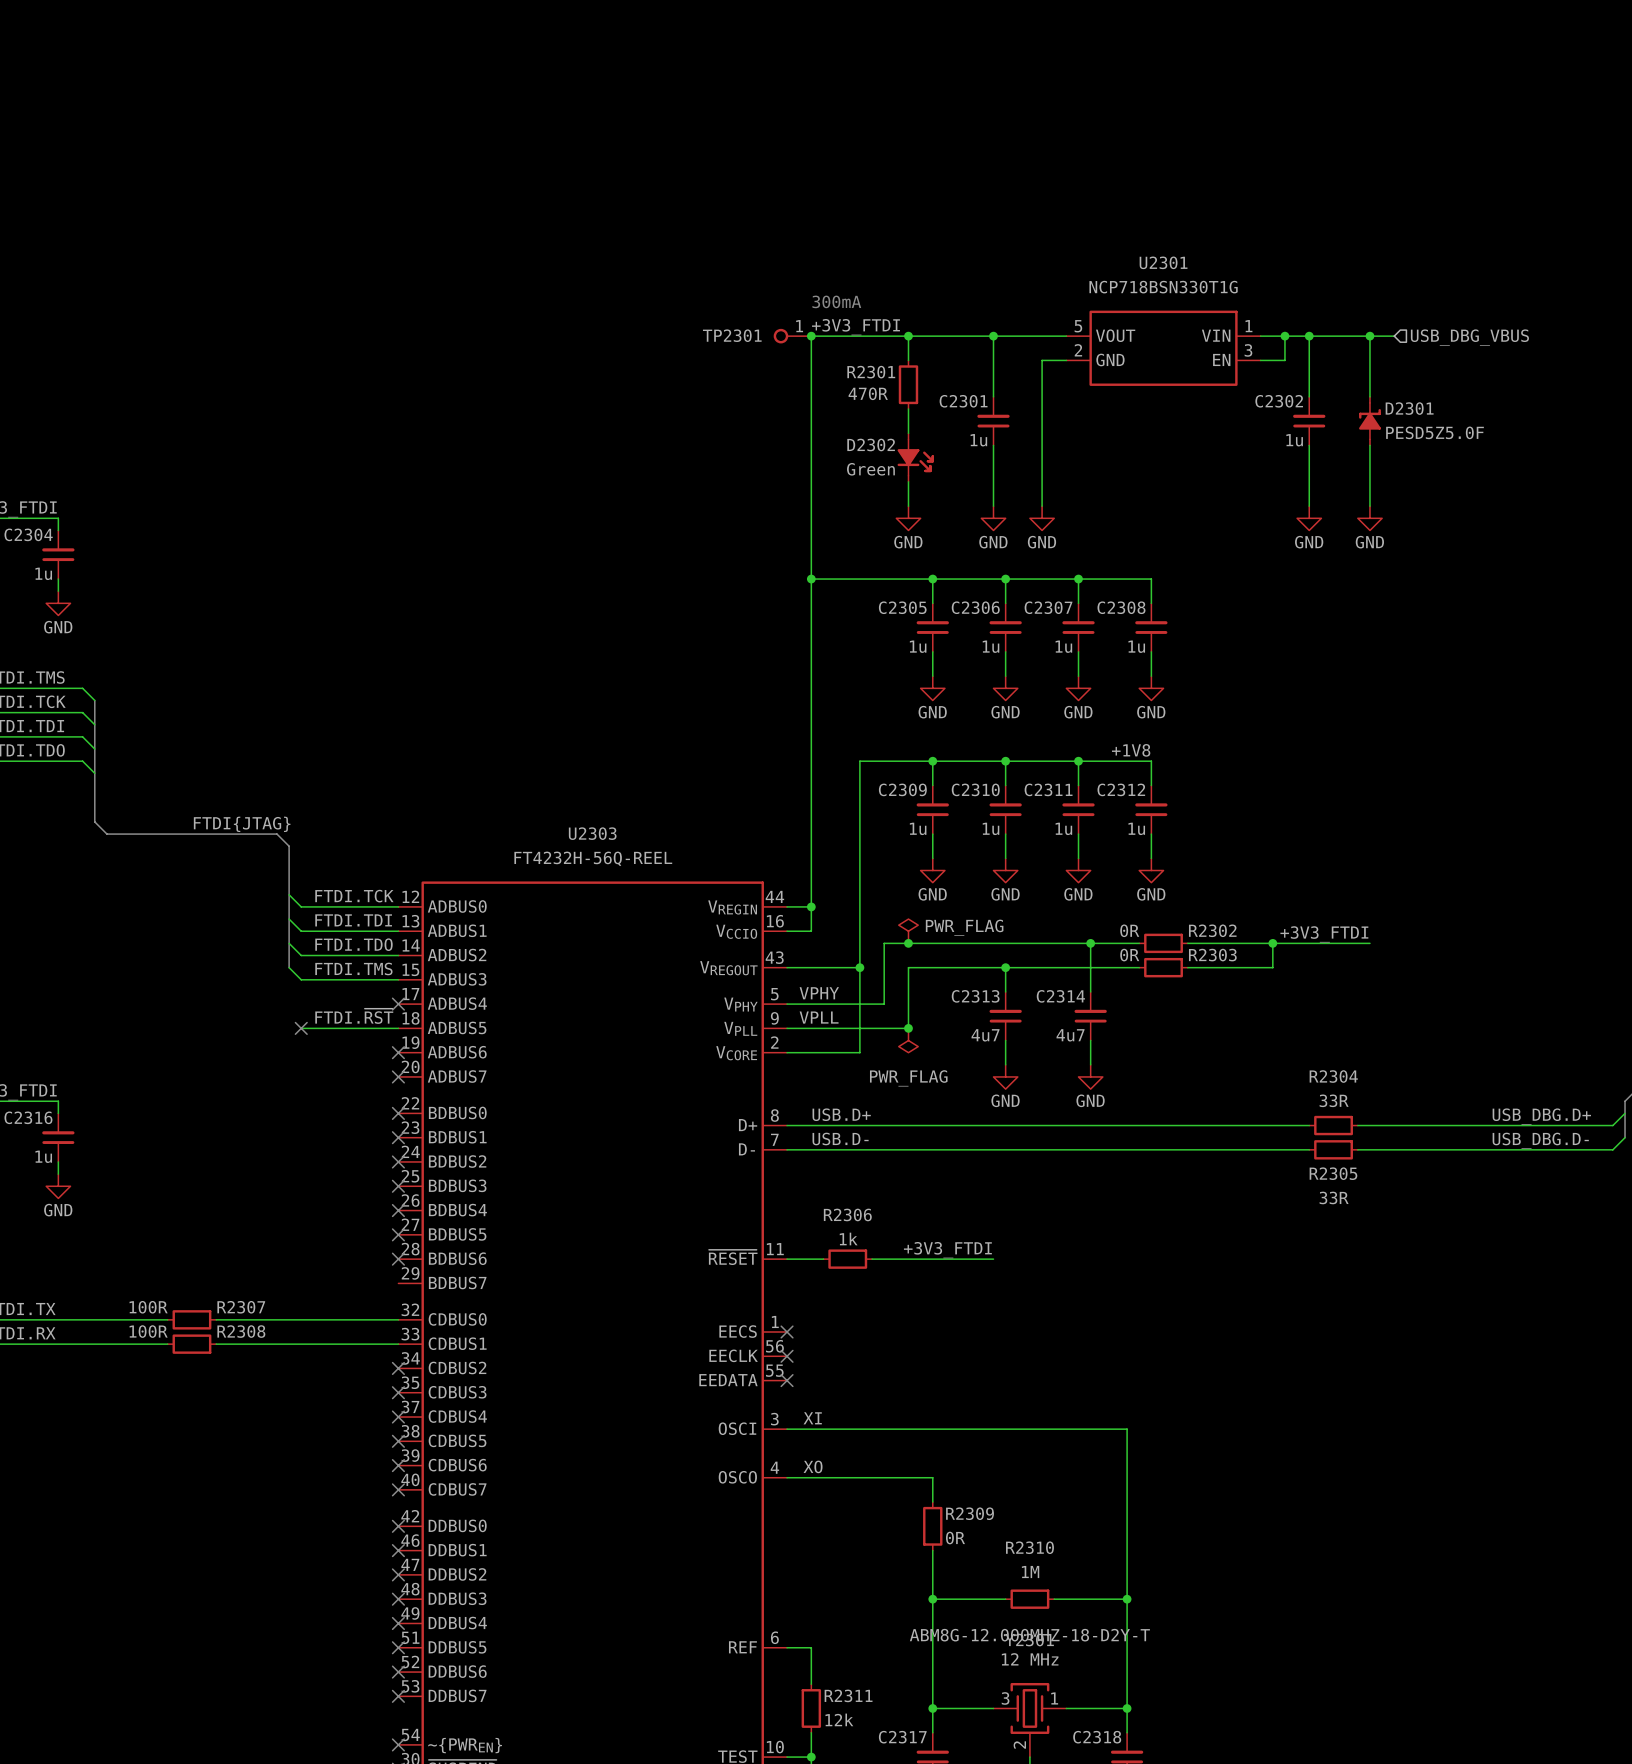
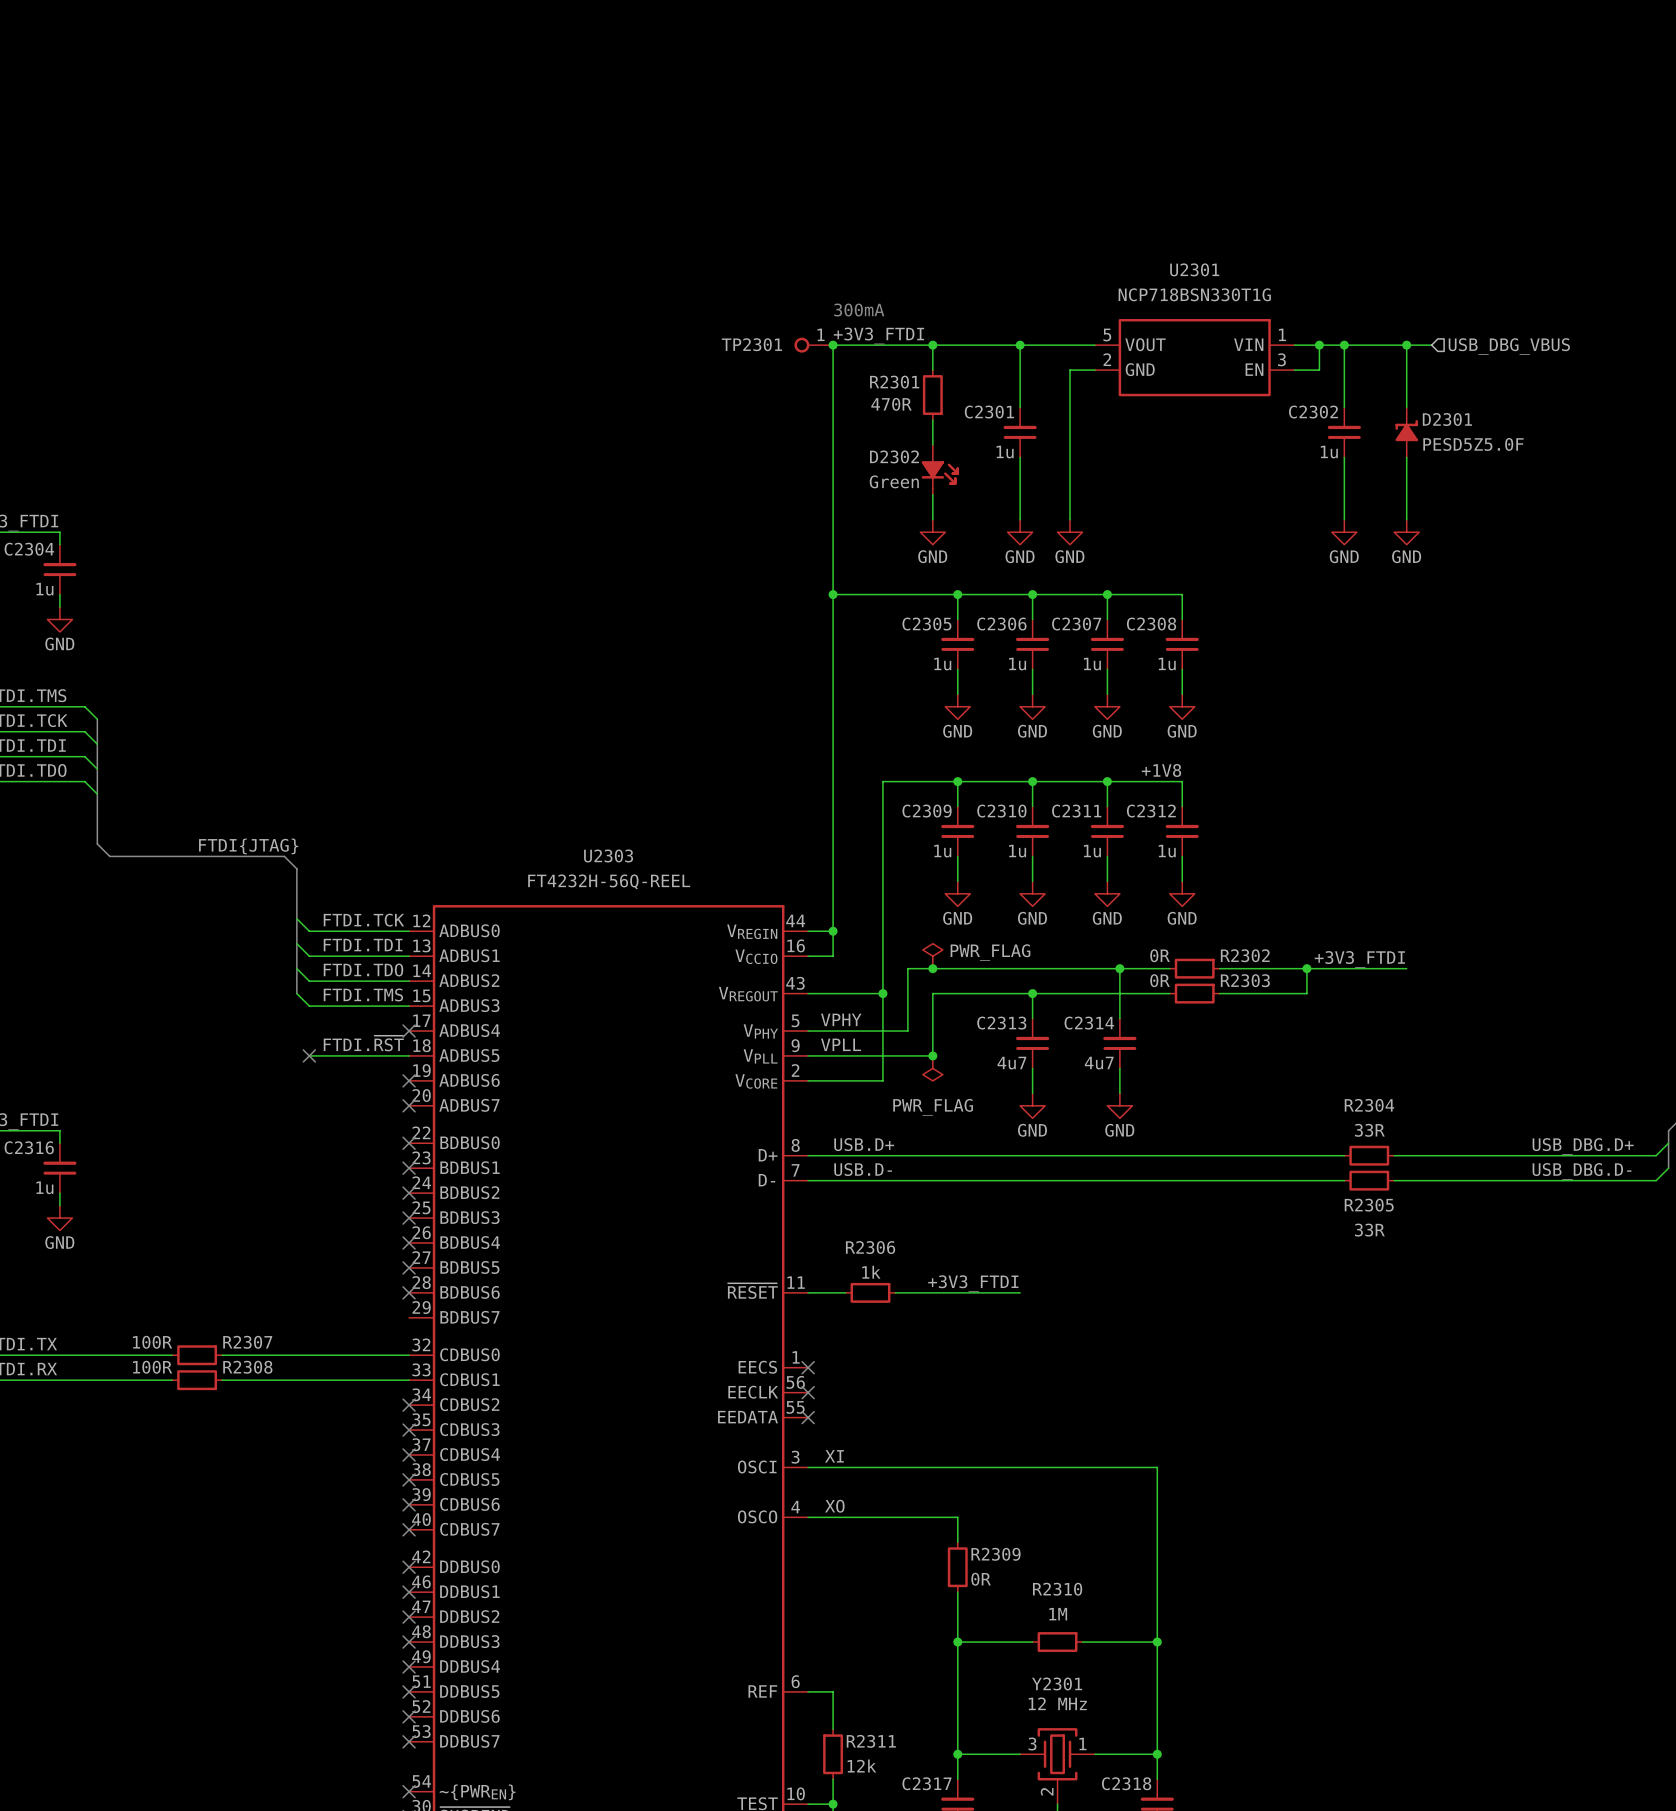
Y2301 text: ABM8G-12.000MHZ-18-D2Y-T (1029, 1635) -> none

